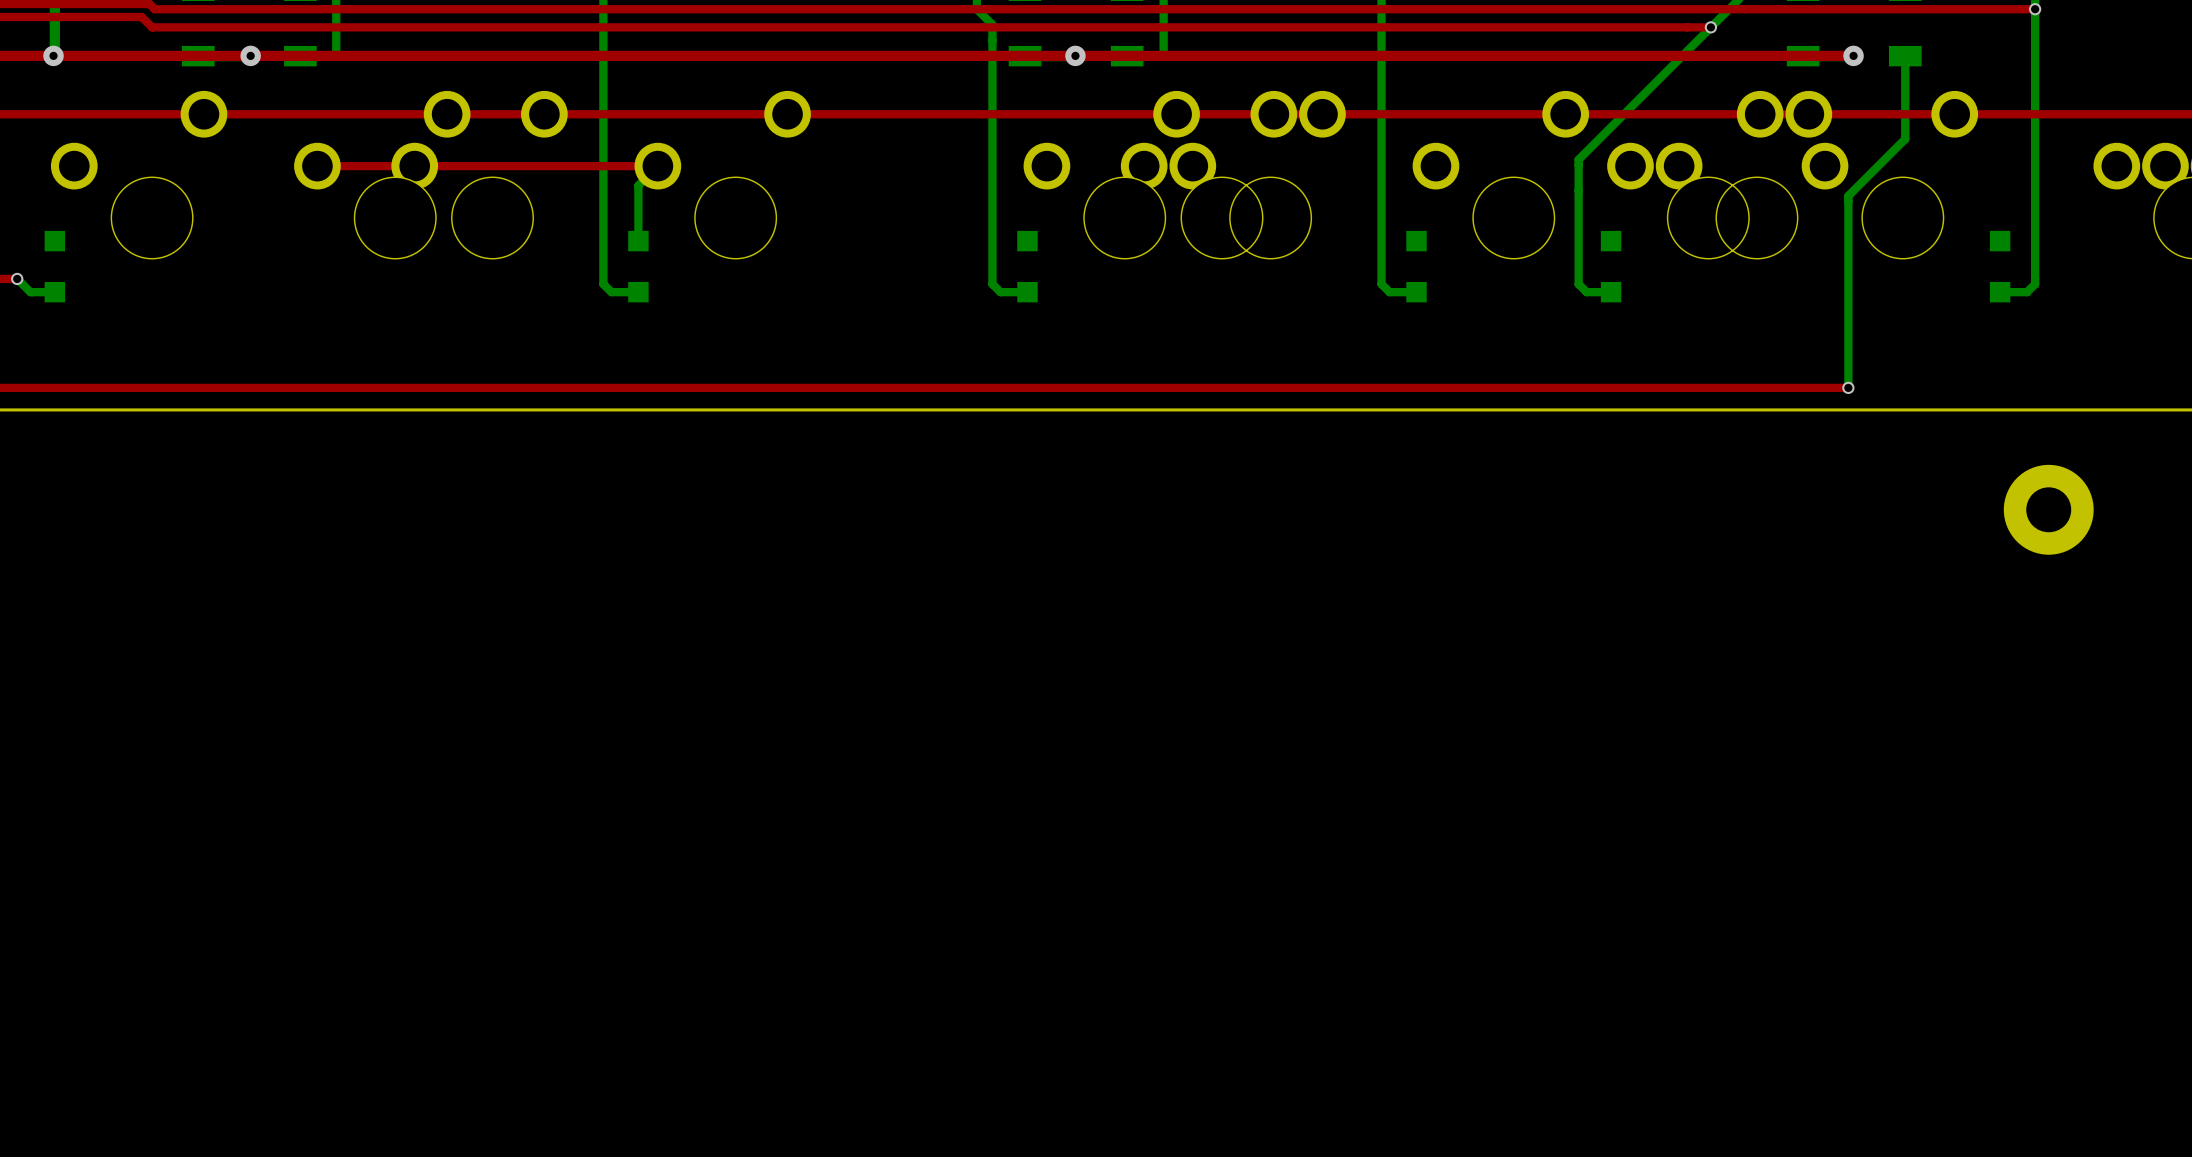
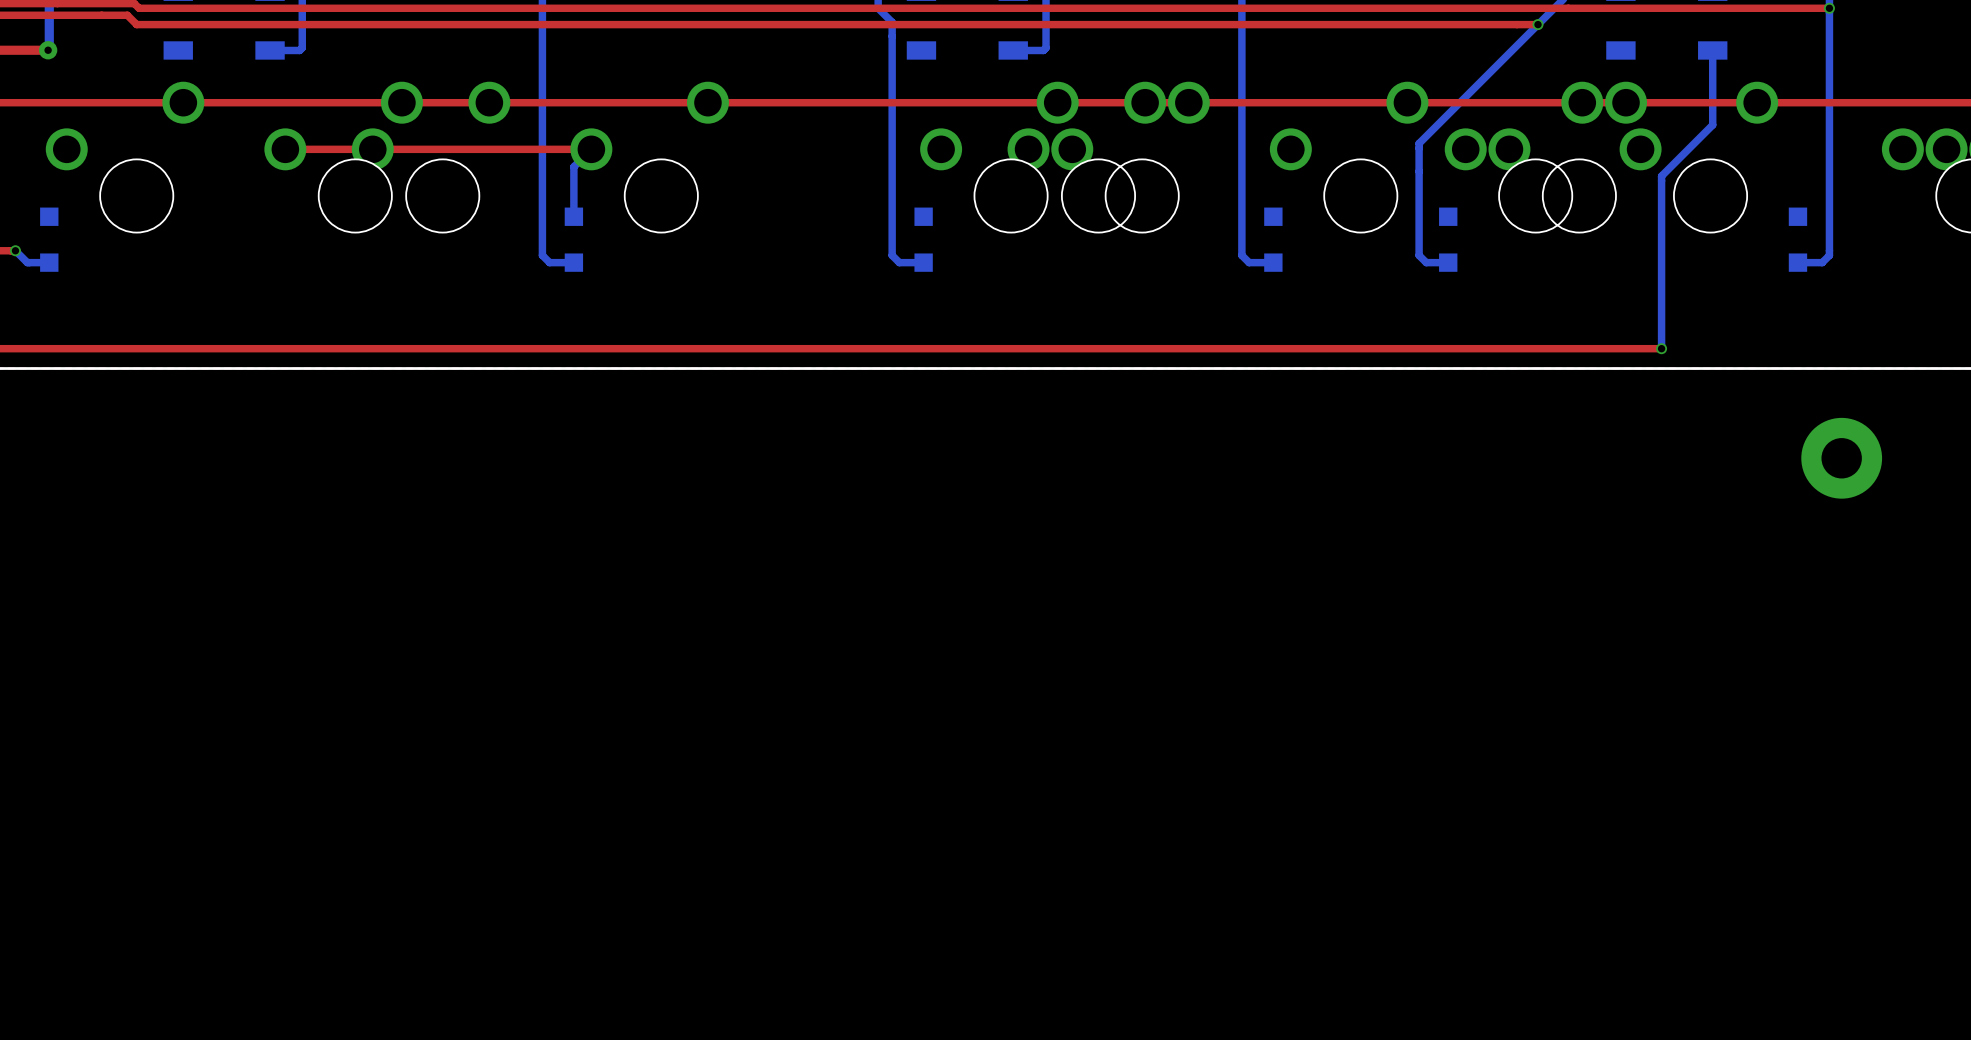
top track: (53, 55) (1853, 55) -> none
via: (250, 55) -> none
via: (1075, 55) -> none
via: (1853, 55) -> none

